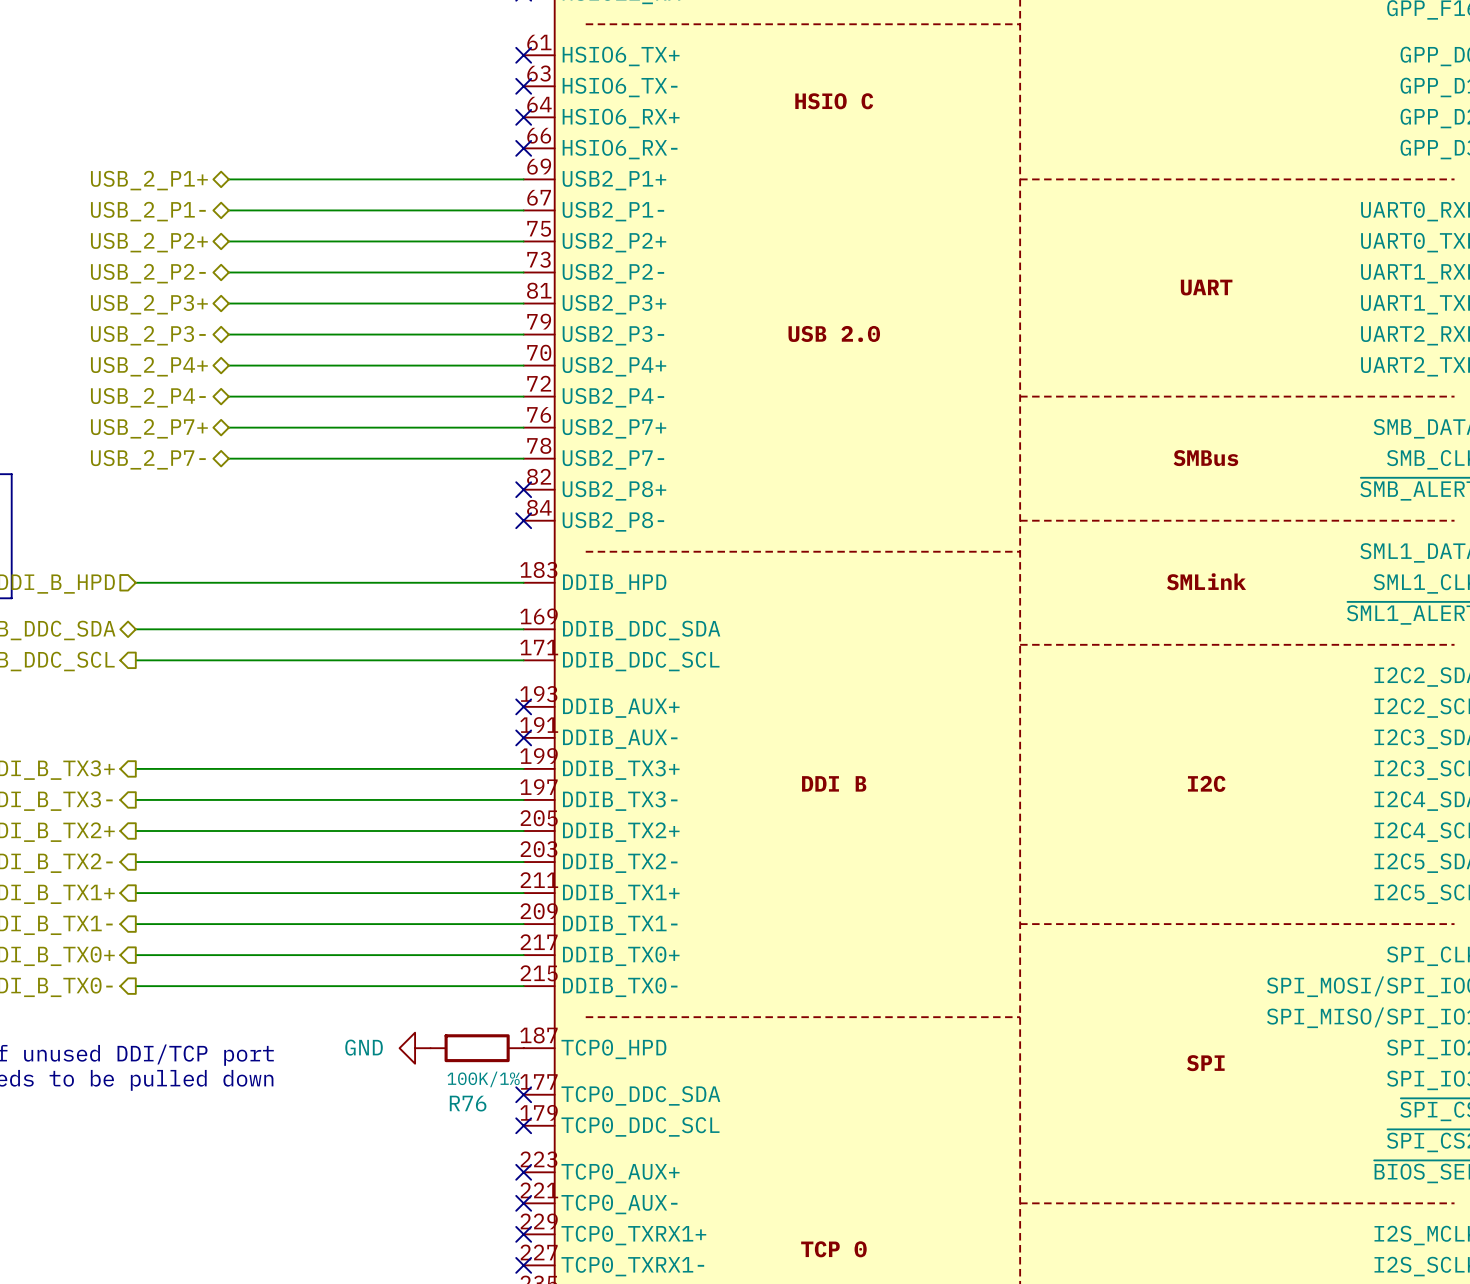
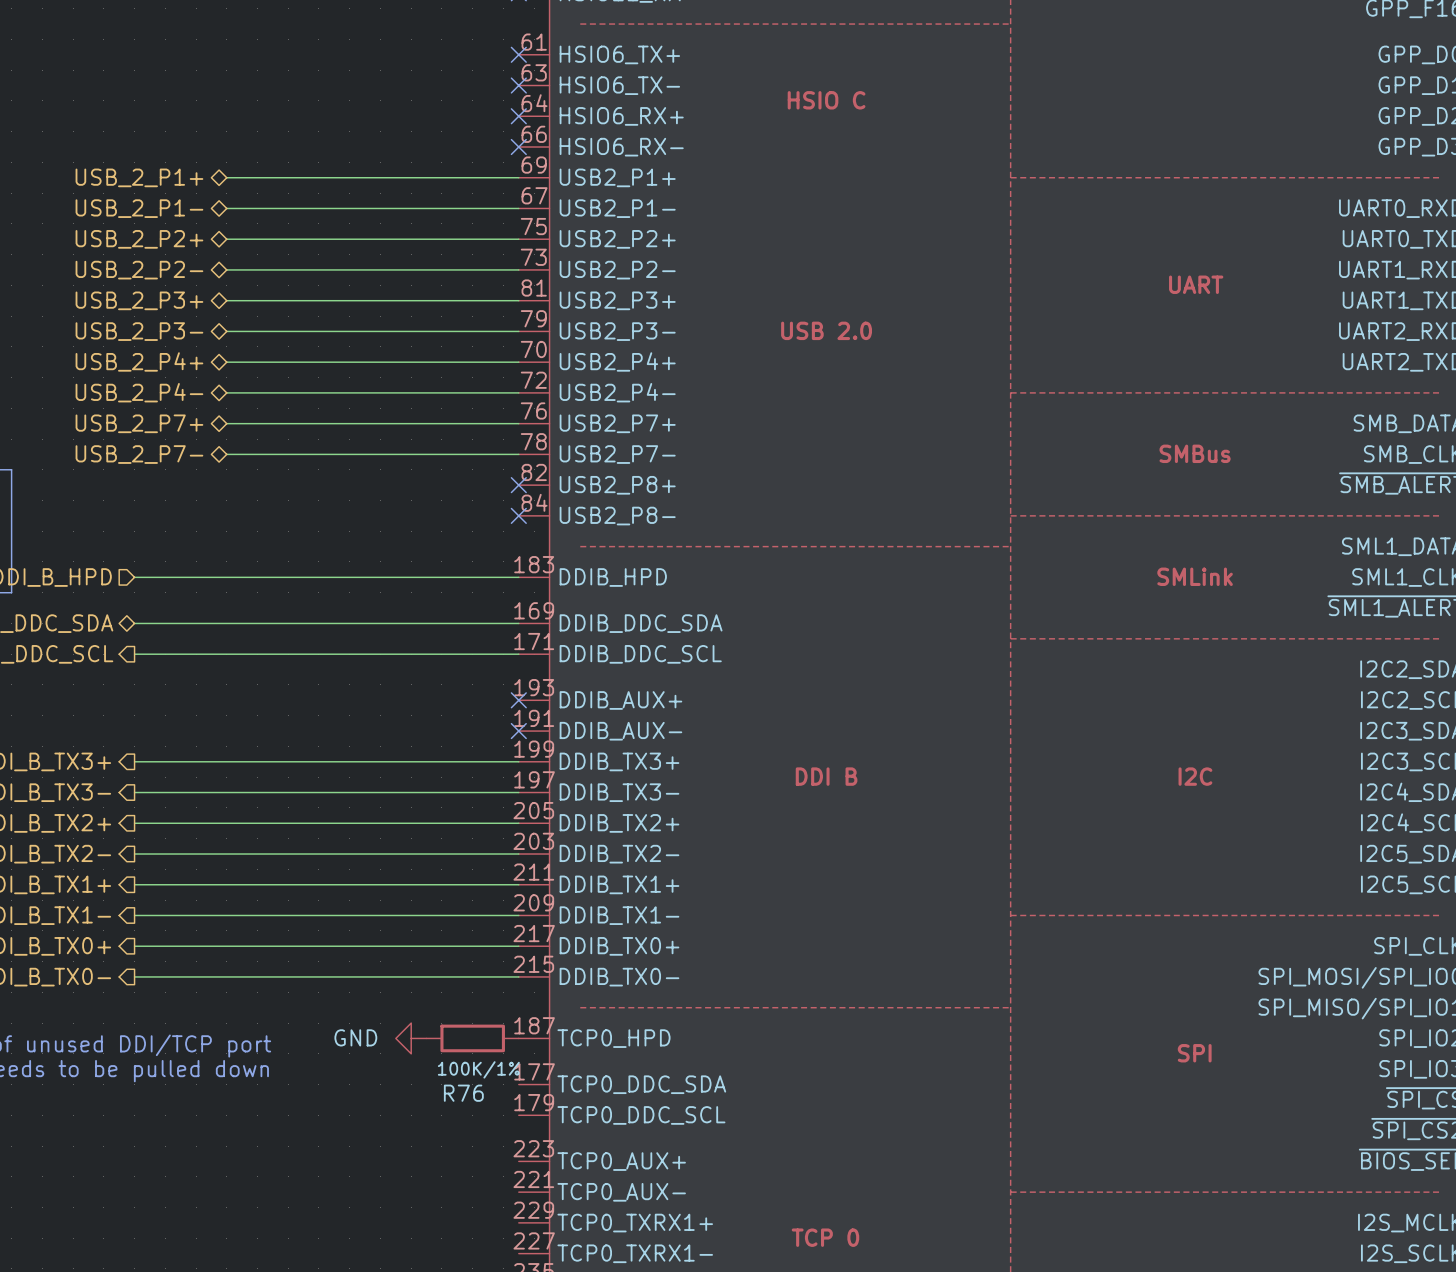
no-connect mark: (523, 1094) -> none
no-connect mark: (523, 1125) -> none
no-connect mark: (523, 1172) -> none
no-connect mark: (523, 1203) -> none
no-connect mark: (523, 1234) -> none
no-connect mark: (523, 1265) -> none

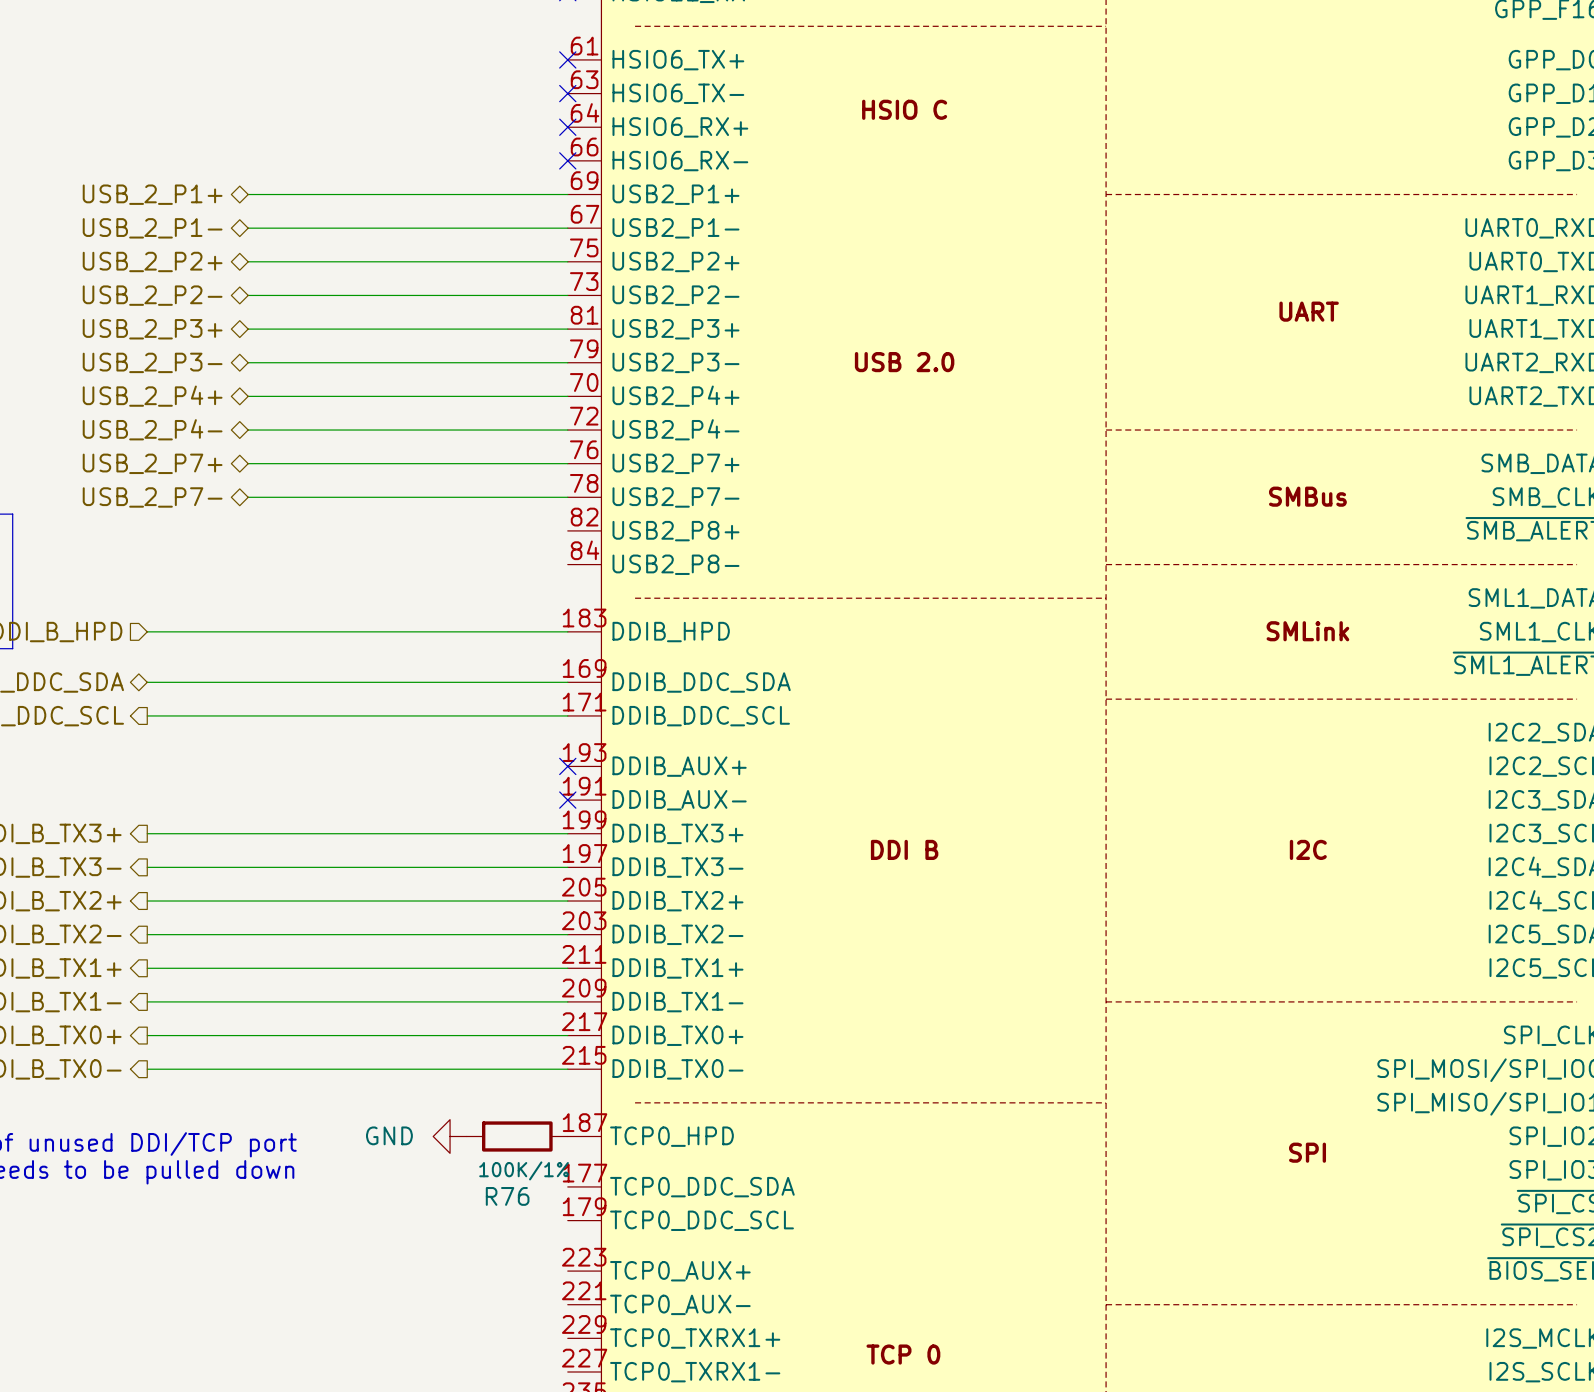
no-connect mark: (518, 485) -> none
no-connect mark: (518, 515) -> none

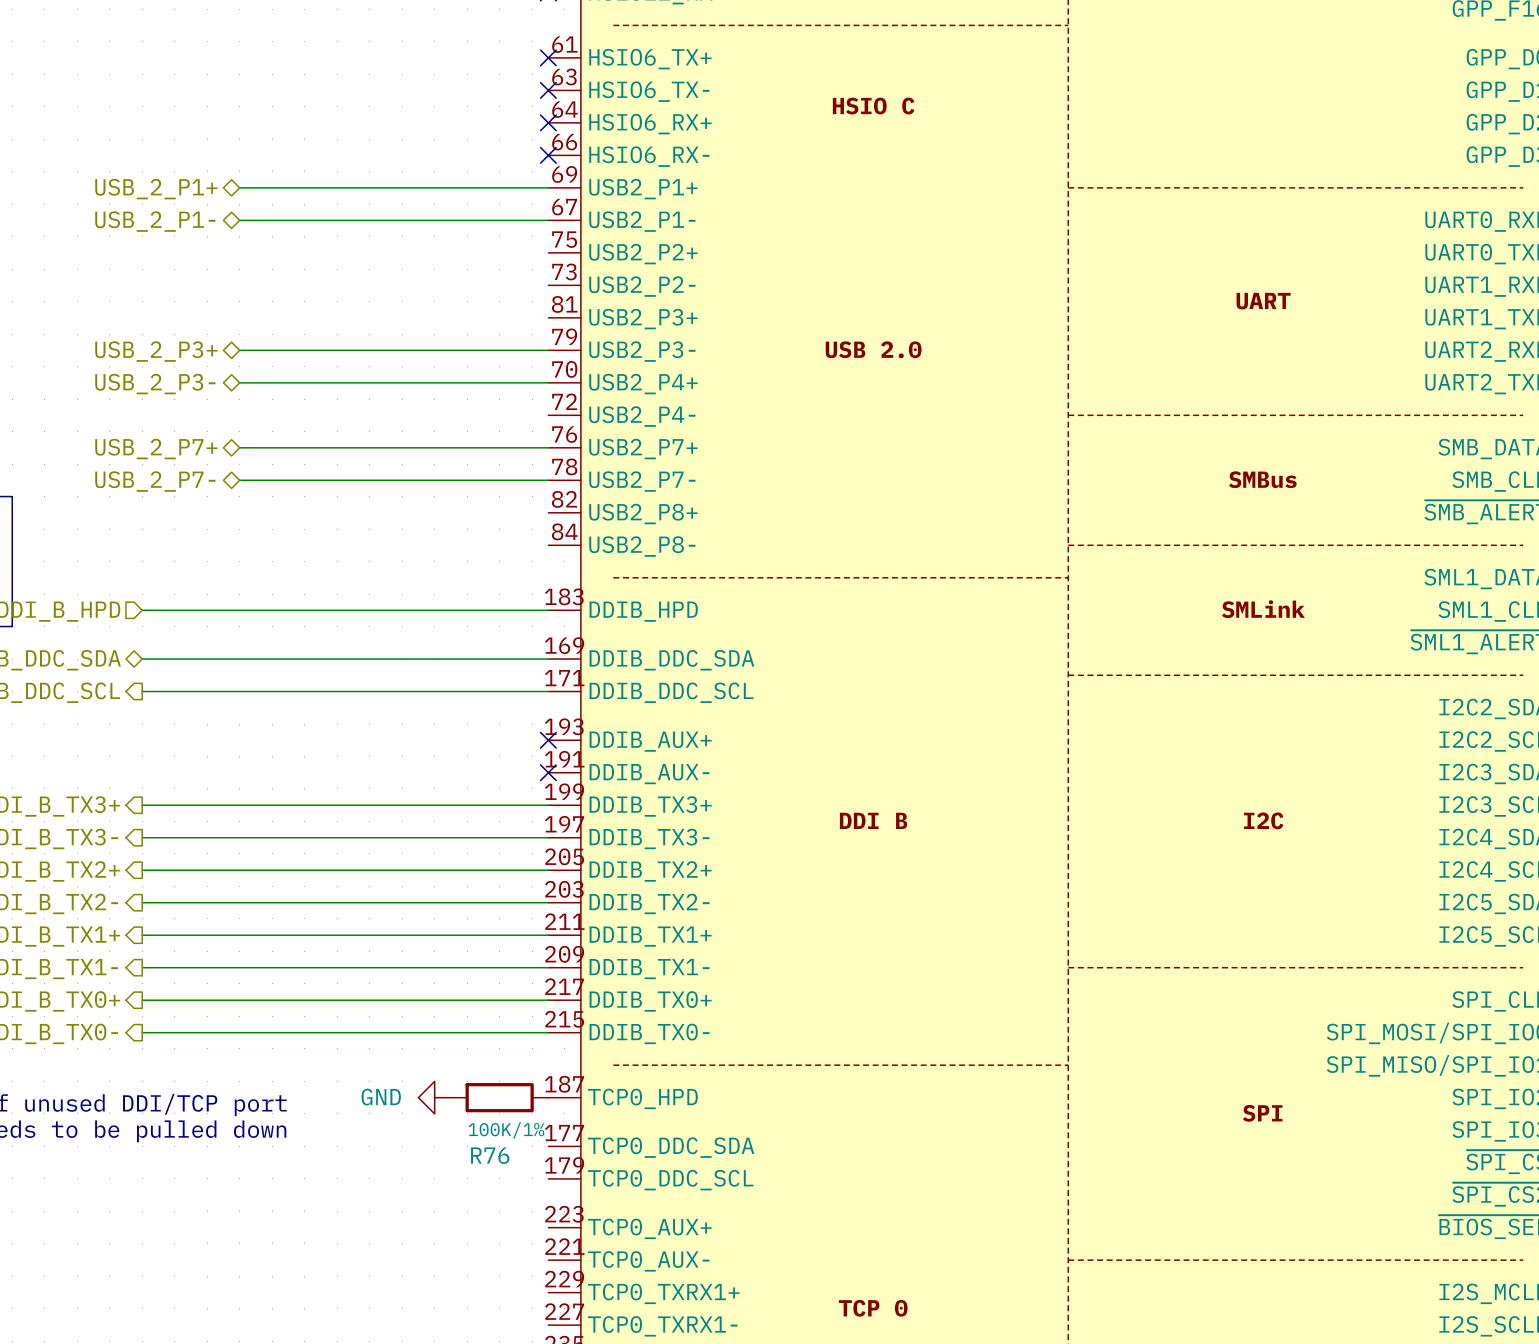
hierarchical label: USB_2_P2+ (152, 261) -> none
wire: (248, 261) (567, 261) -> none
hierarchical label: USB_2_P2- (152, 295) -> none
wire: (248, 295) (567, 295) -> none
hierarchical label: USB_2_P3+ (152, 329) -> none
wire: (248, 329) (567, 329) -> none
hierarchical label: USB_2_P3- (152, 362) -> USB_2_P3+ (156, 351)
hierarchical label: USB_2_P4+ (152, 396) -> USB_2_P3- (155, 384)
hierarchical label: USB_2_P4- (152, 429) -> none
wire: (248, 430) (567, 430) -> none

